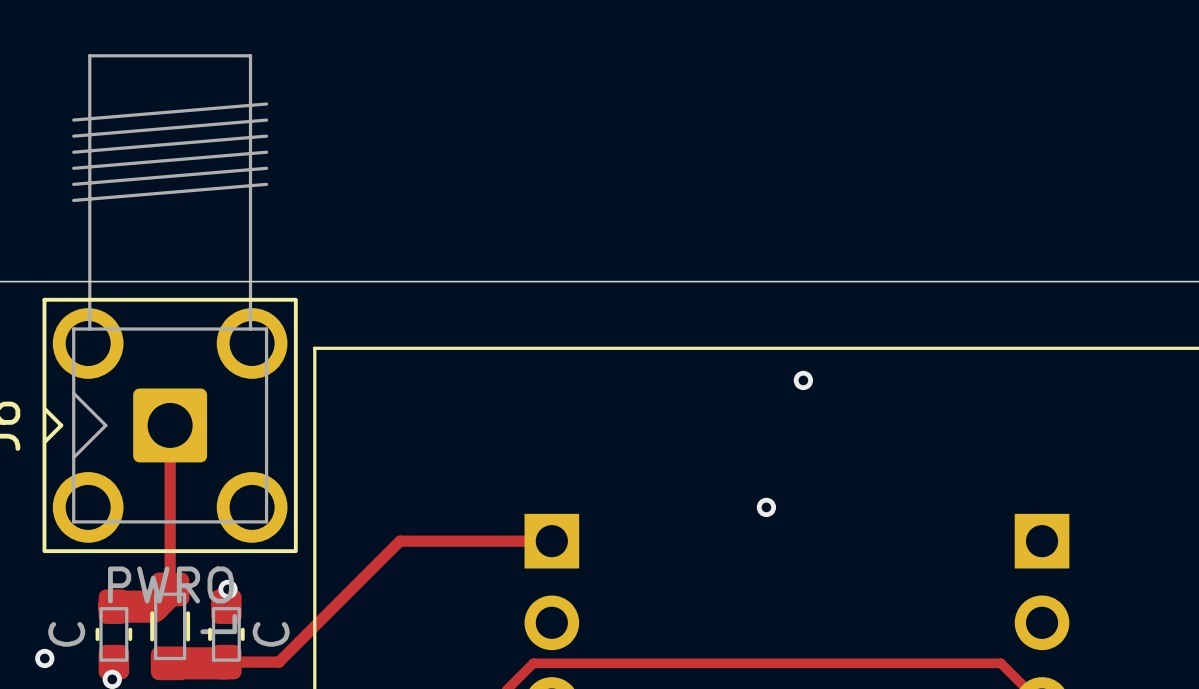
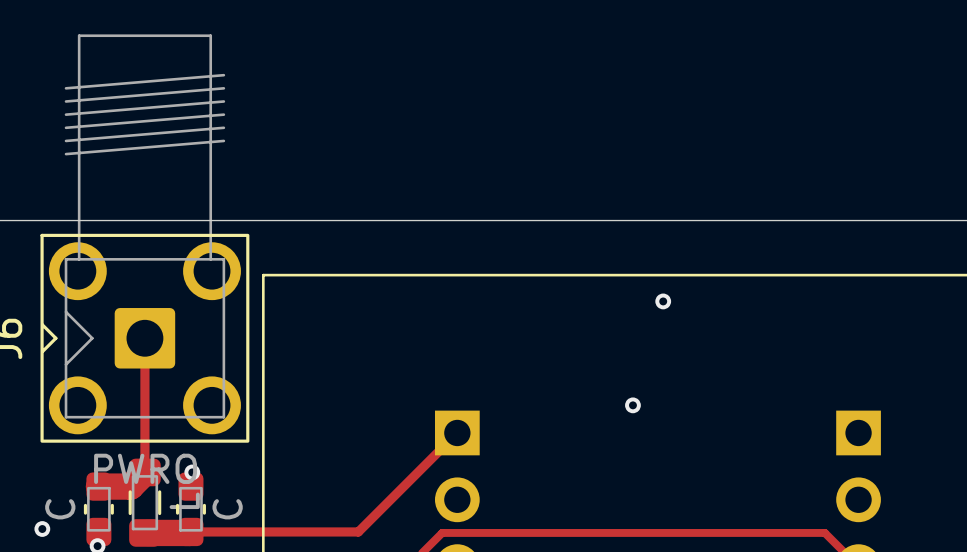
track: (551, 541) (399, 541) (279, 662) -> (457, 432) (358, 531) (234, 531)

